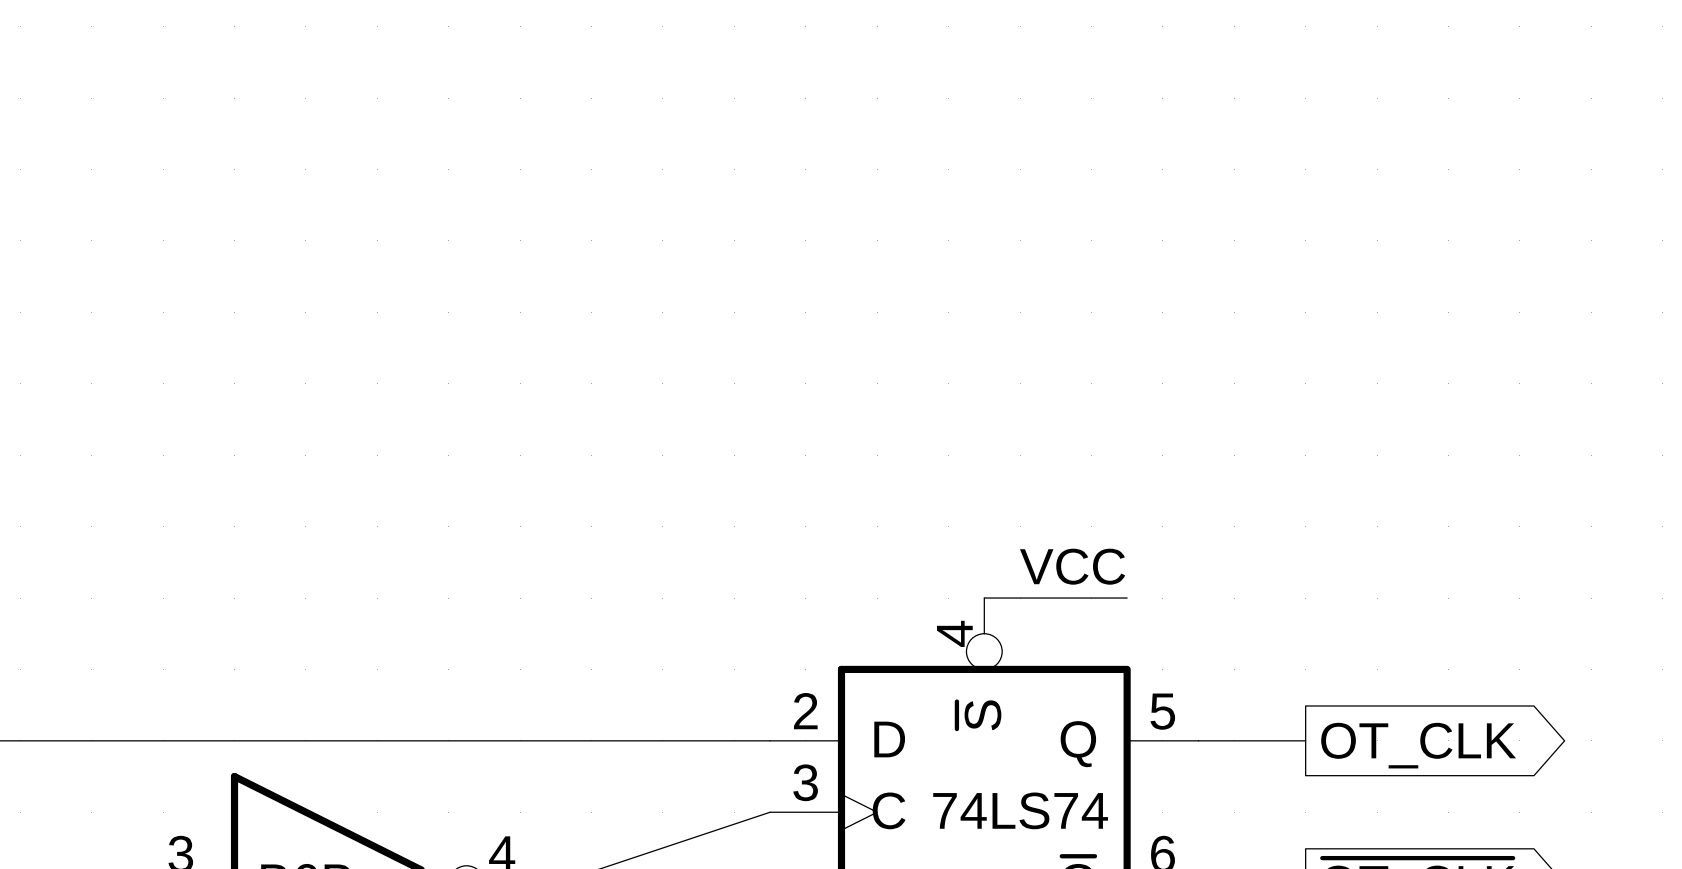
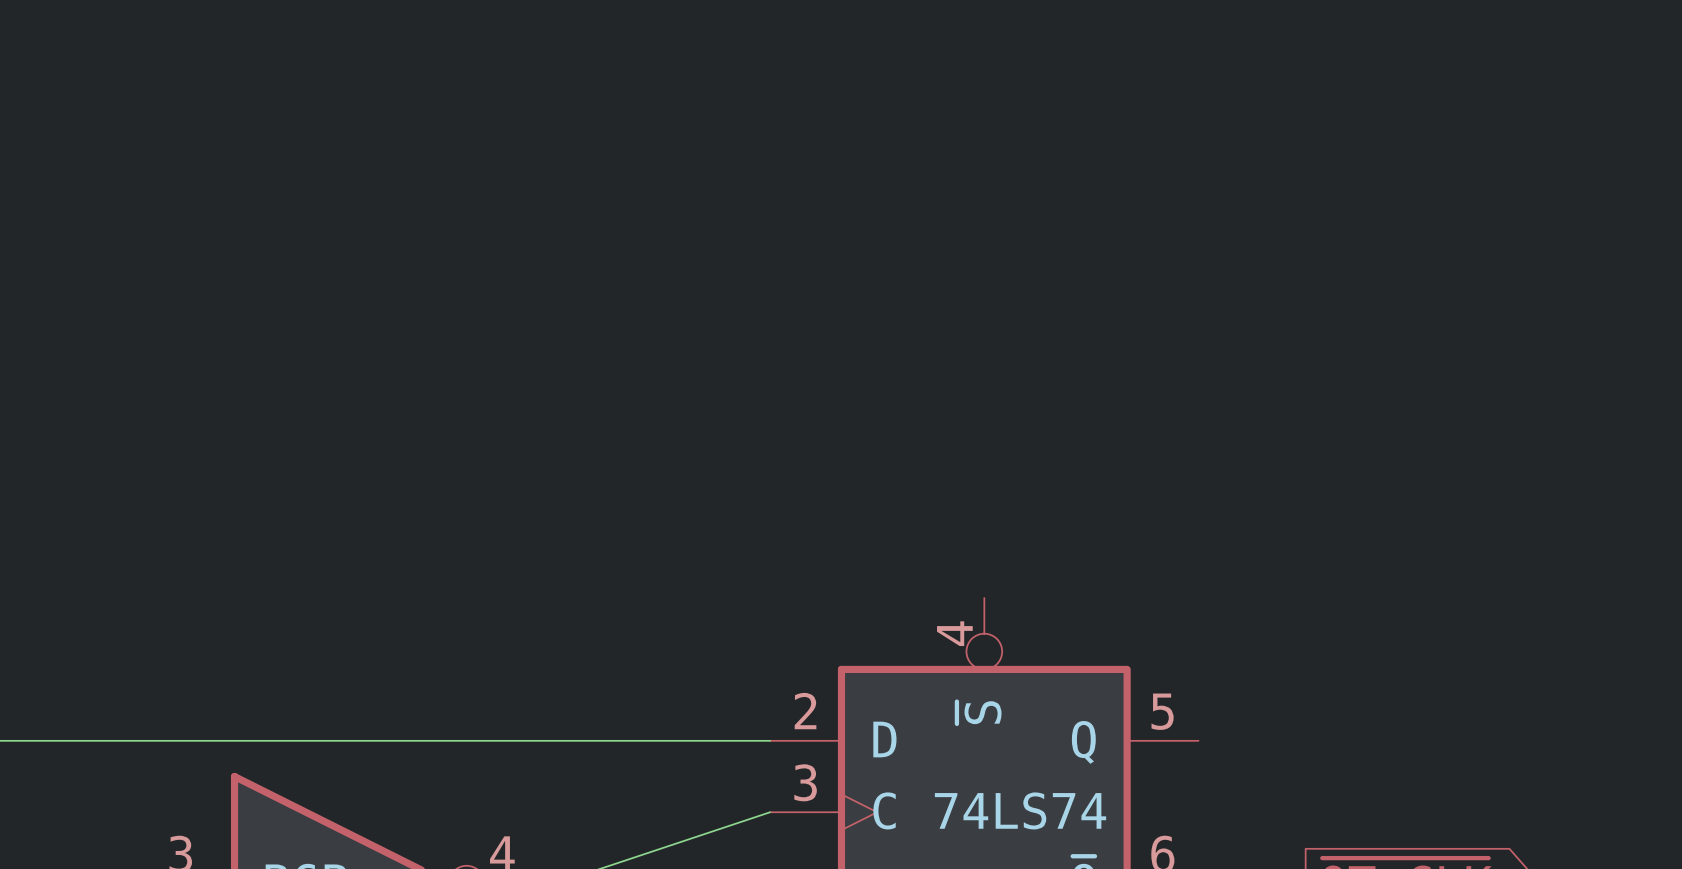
label: VCC (1072, 566) -> none
wire: (984, 598) (1127, 598) -> none
wire: (1198, 740) (1305, 740) -> none
global label: OT_CLK (1418, 745) -> none

